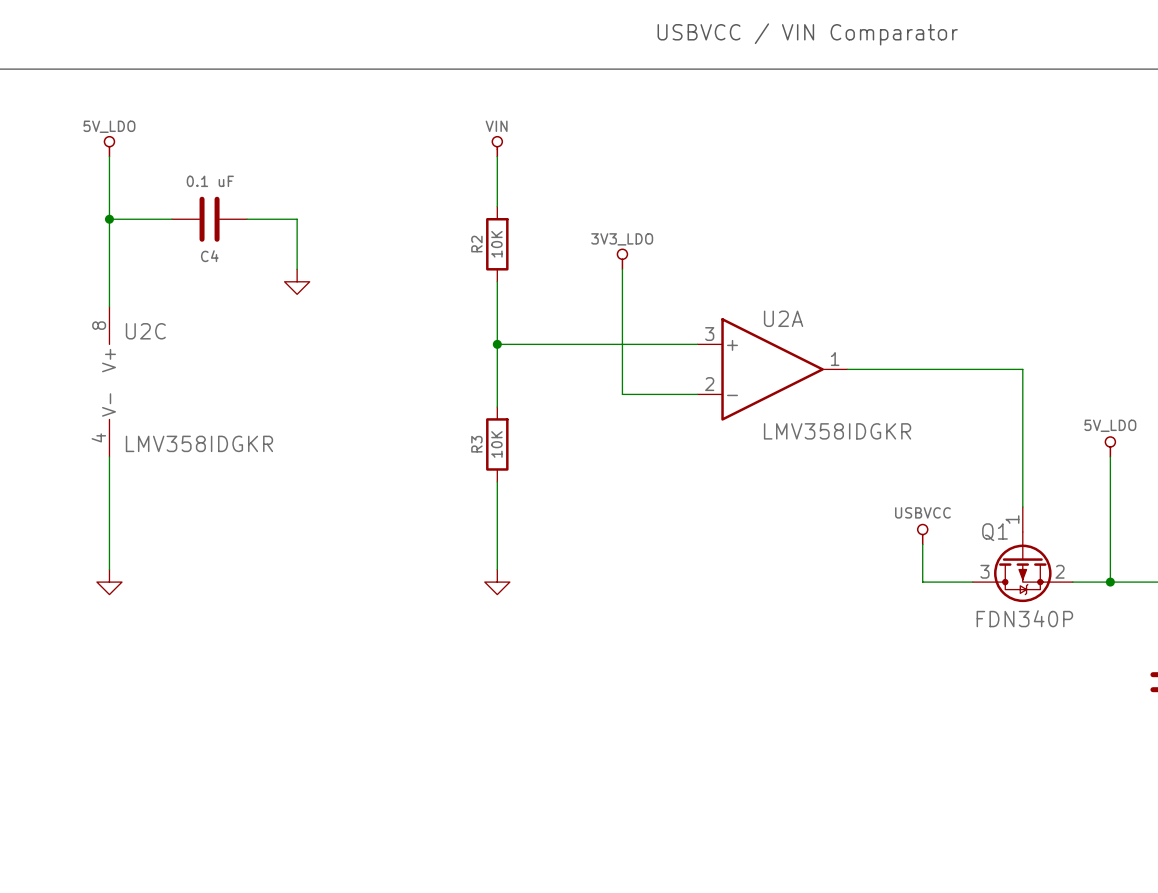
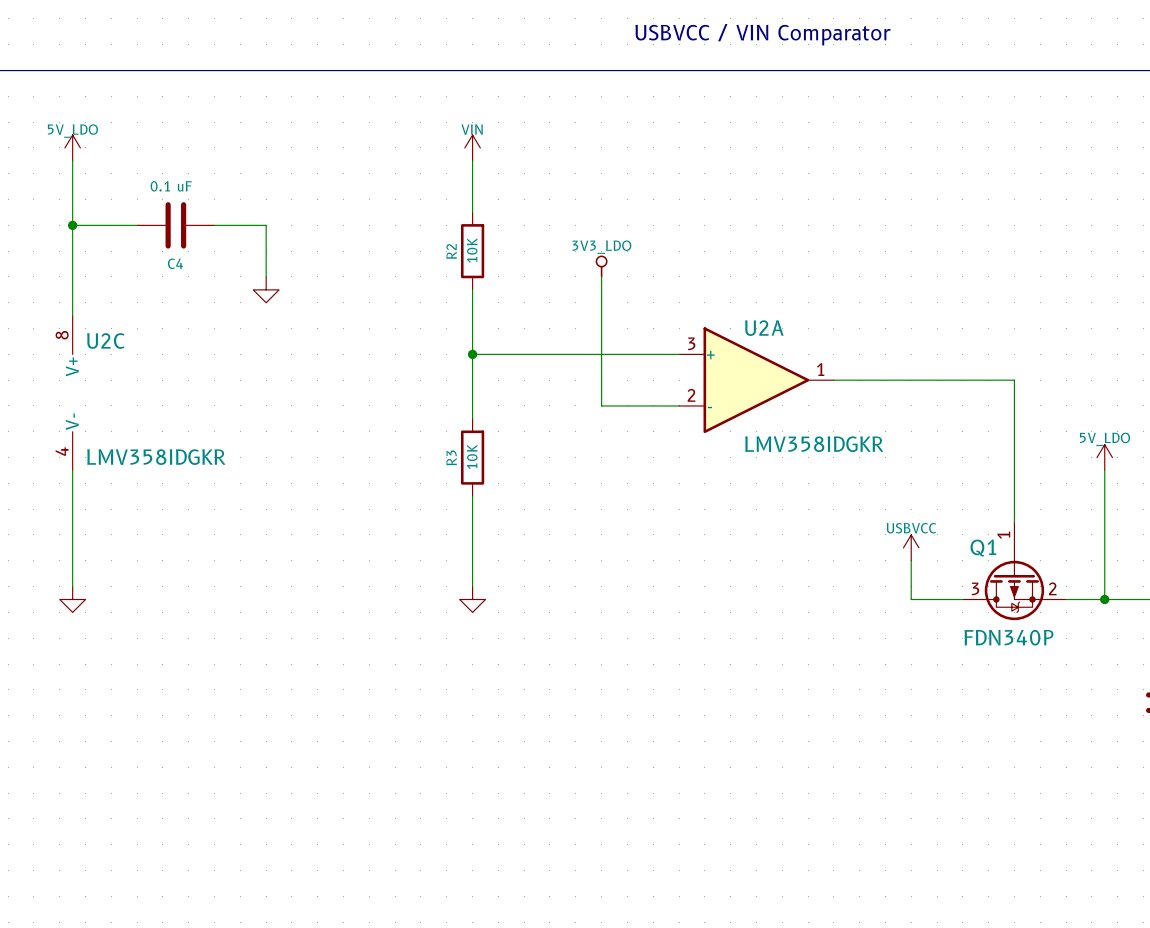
power symbol shape: [103, 135, 116, 158] -> [64, 135, 81, 161]
power symbol shape: [491, 135, 504, 158] -> [464, 135, 481, 161]
power symbol shape: [1104, 436, 1117, 458] -> [1096, 444, 1113, 471]
power symbol shape: [916, 523, 929, 546] -> [903, 534, 919, 561]

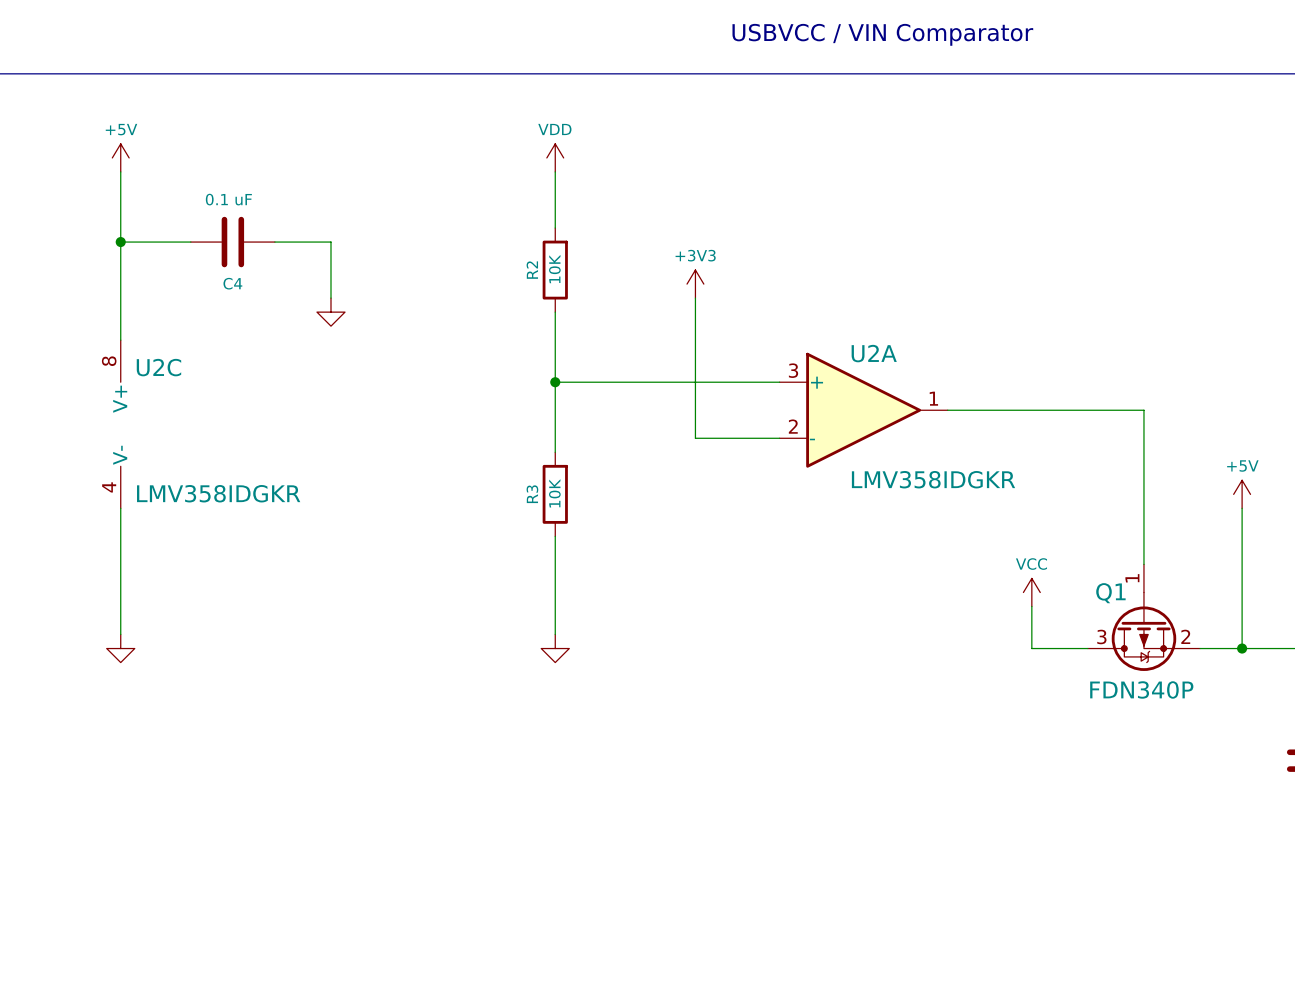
power symbol: 5V_LDO (72, 147) -> +5V (120, 157)
power symbol: VIN (472, 147) -> VDD (555, 157)
power symbol: 3V3_LDO (601, 266) -> +3V3 (695, 284)
power symbol: 5V_LDO (1104, 457) -> +5V (1242, 494)
power symbol: USBVCC (911, 547) -> VCC (1031, 592)

